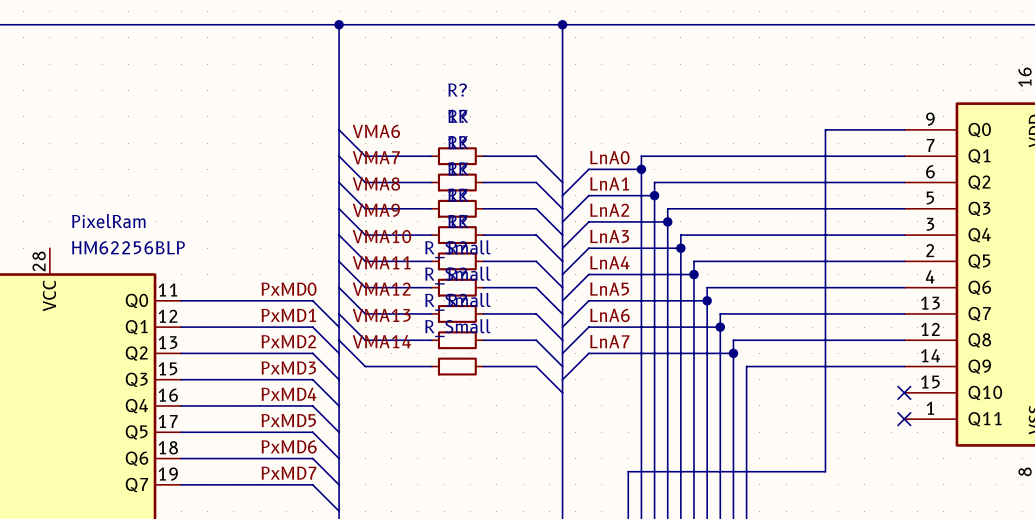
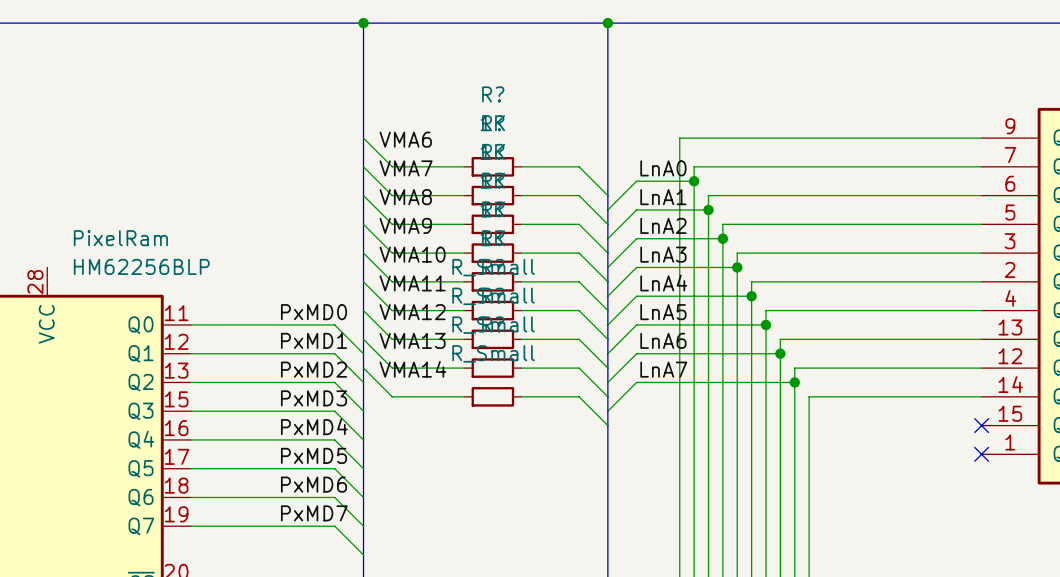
wire: (825, 129) (825, 471) (628, 471) -> (895, 138) (679, 138) (679, 511)

